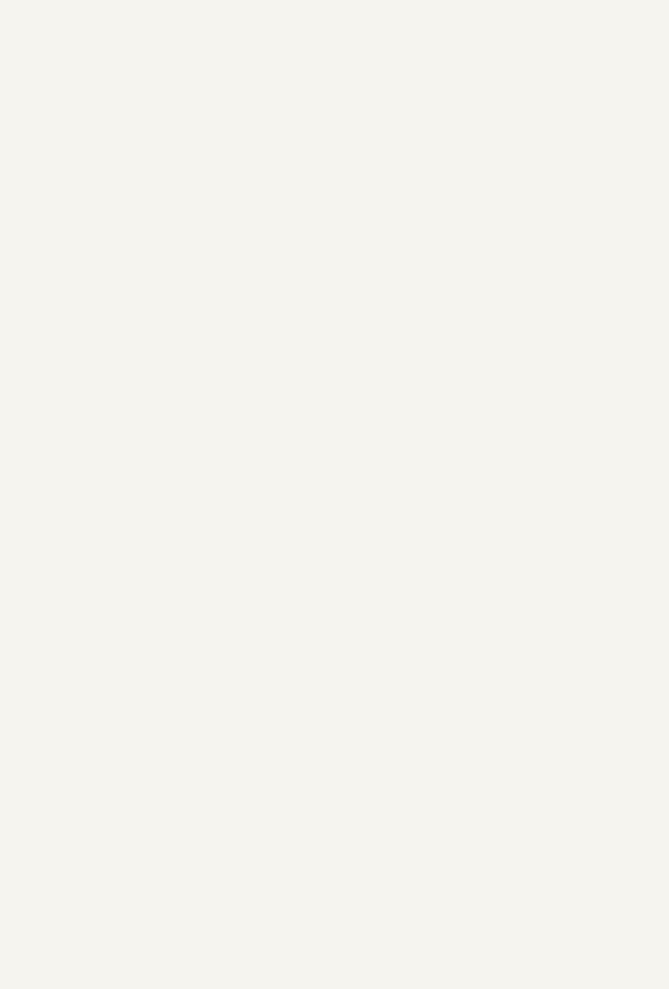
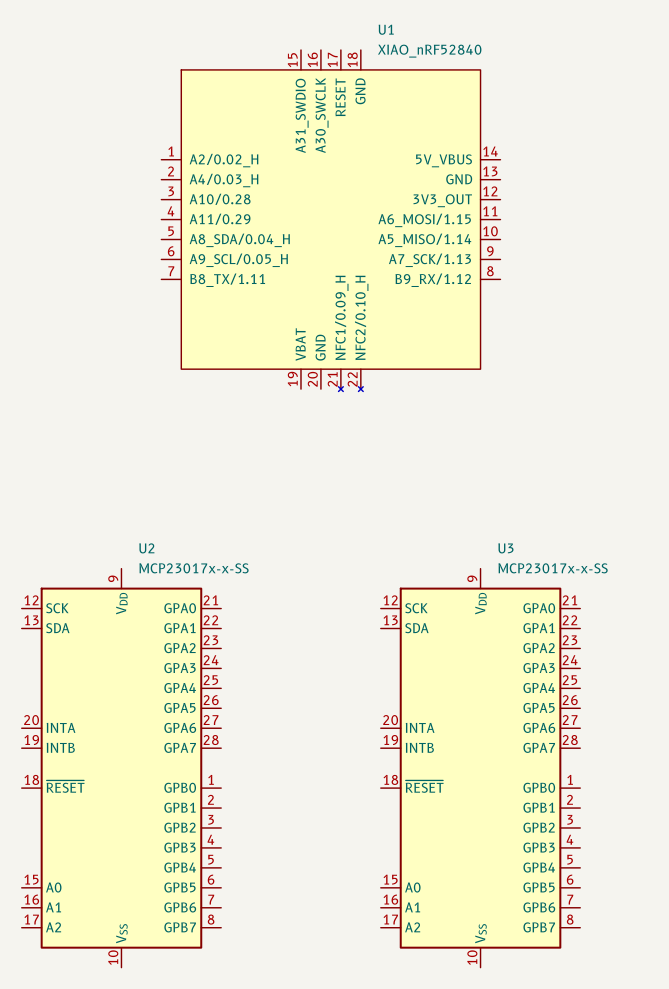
U1: none -> XIAO_nRF52840 (330, 220)
U2: none -> MCP23017x-x-SS (121, 768)
U3: none -> MCP23017x-x-SS (480, 768)

